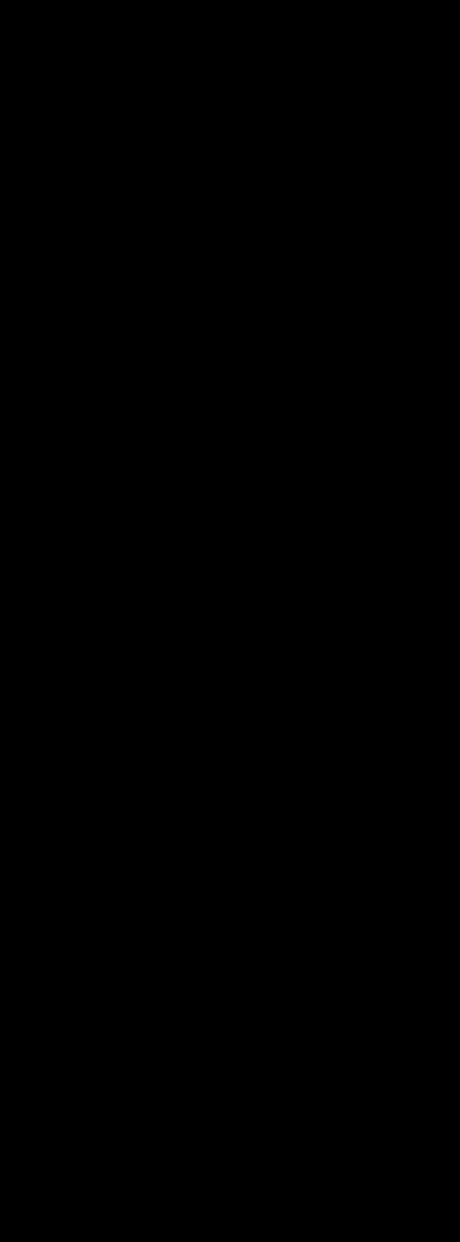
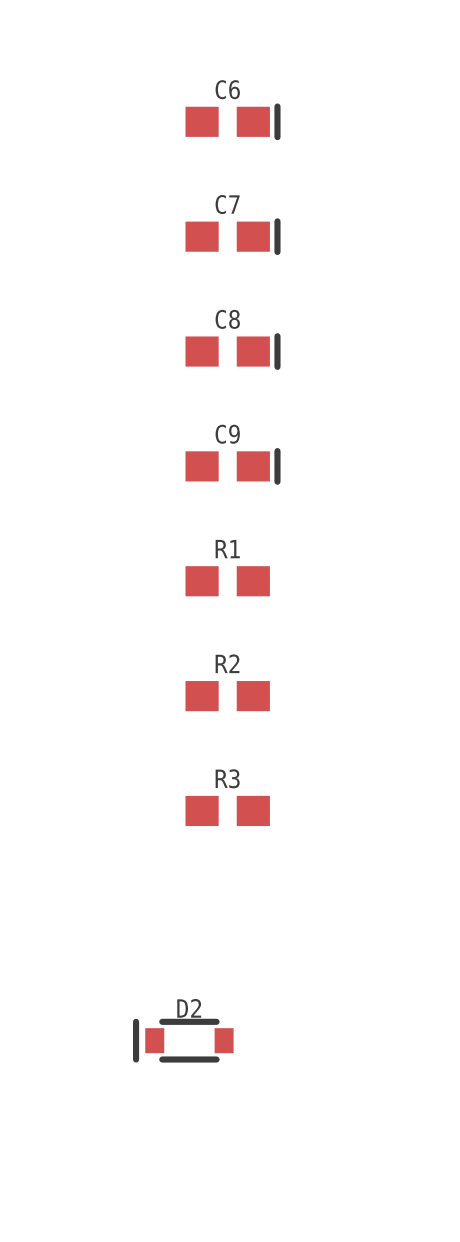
C6: none -> (233, 121)
C7: none -> (233, 236)
C8: none -> (233, 351)
C9: none -> (233, 466)
R1: none -> (227, 581)
R2: none -> (227, 696)
R3: none -> (227, 810)
D2: none -> (183, 1040)

